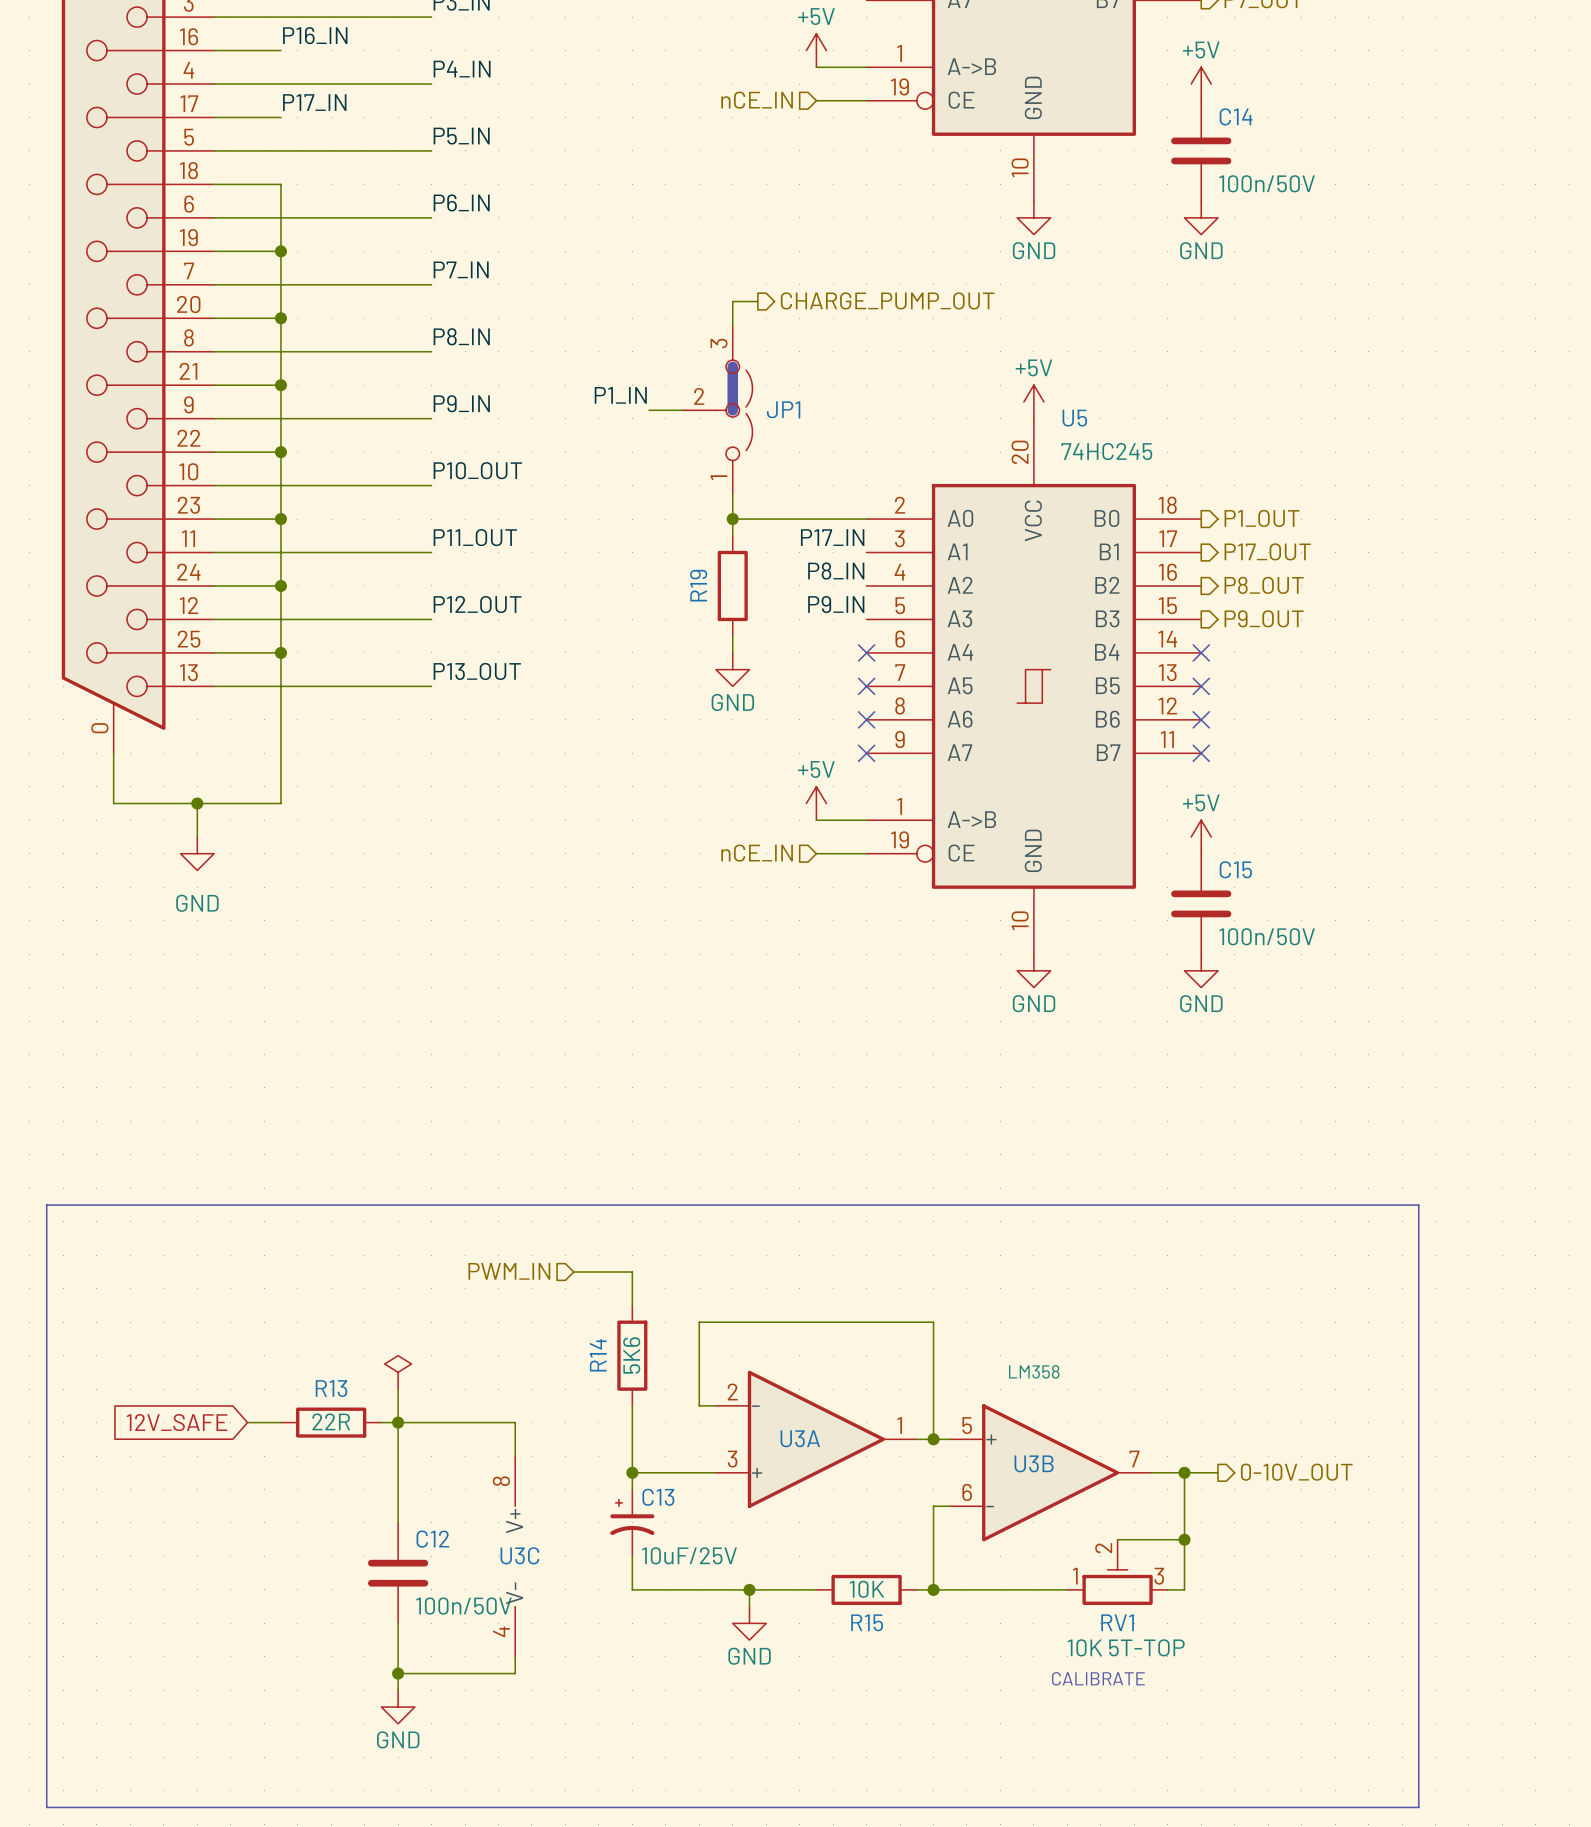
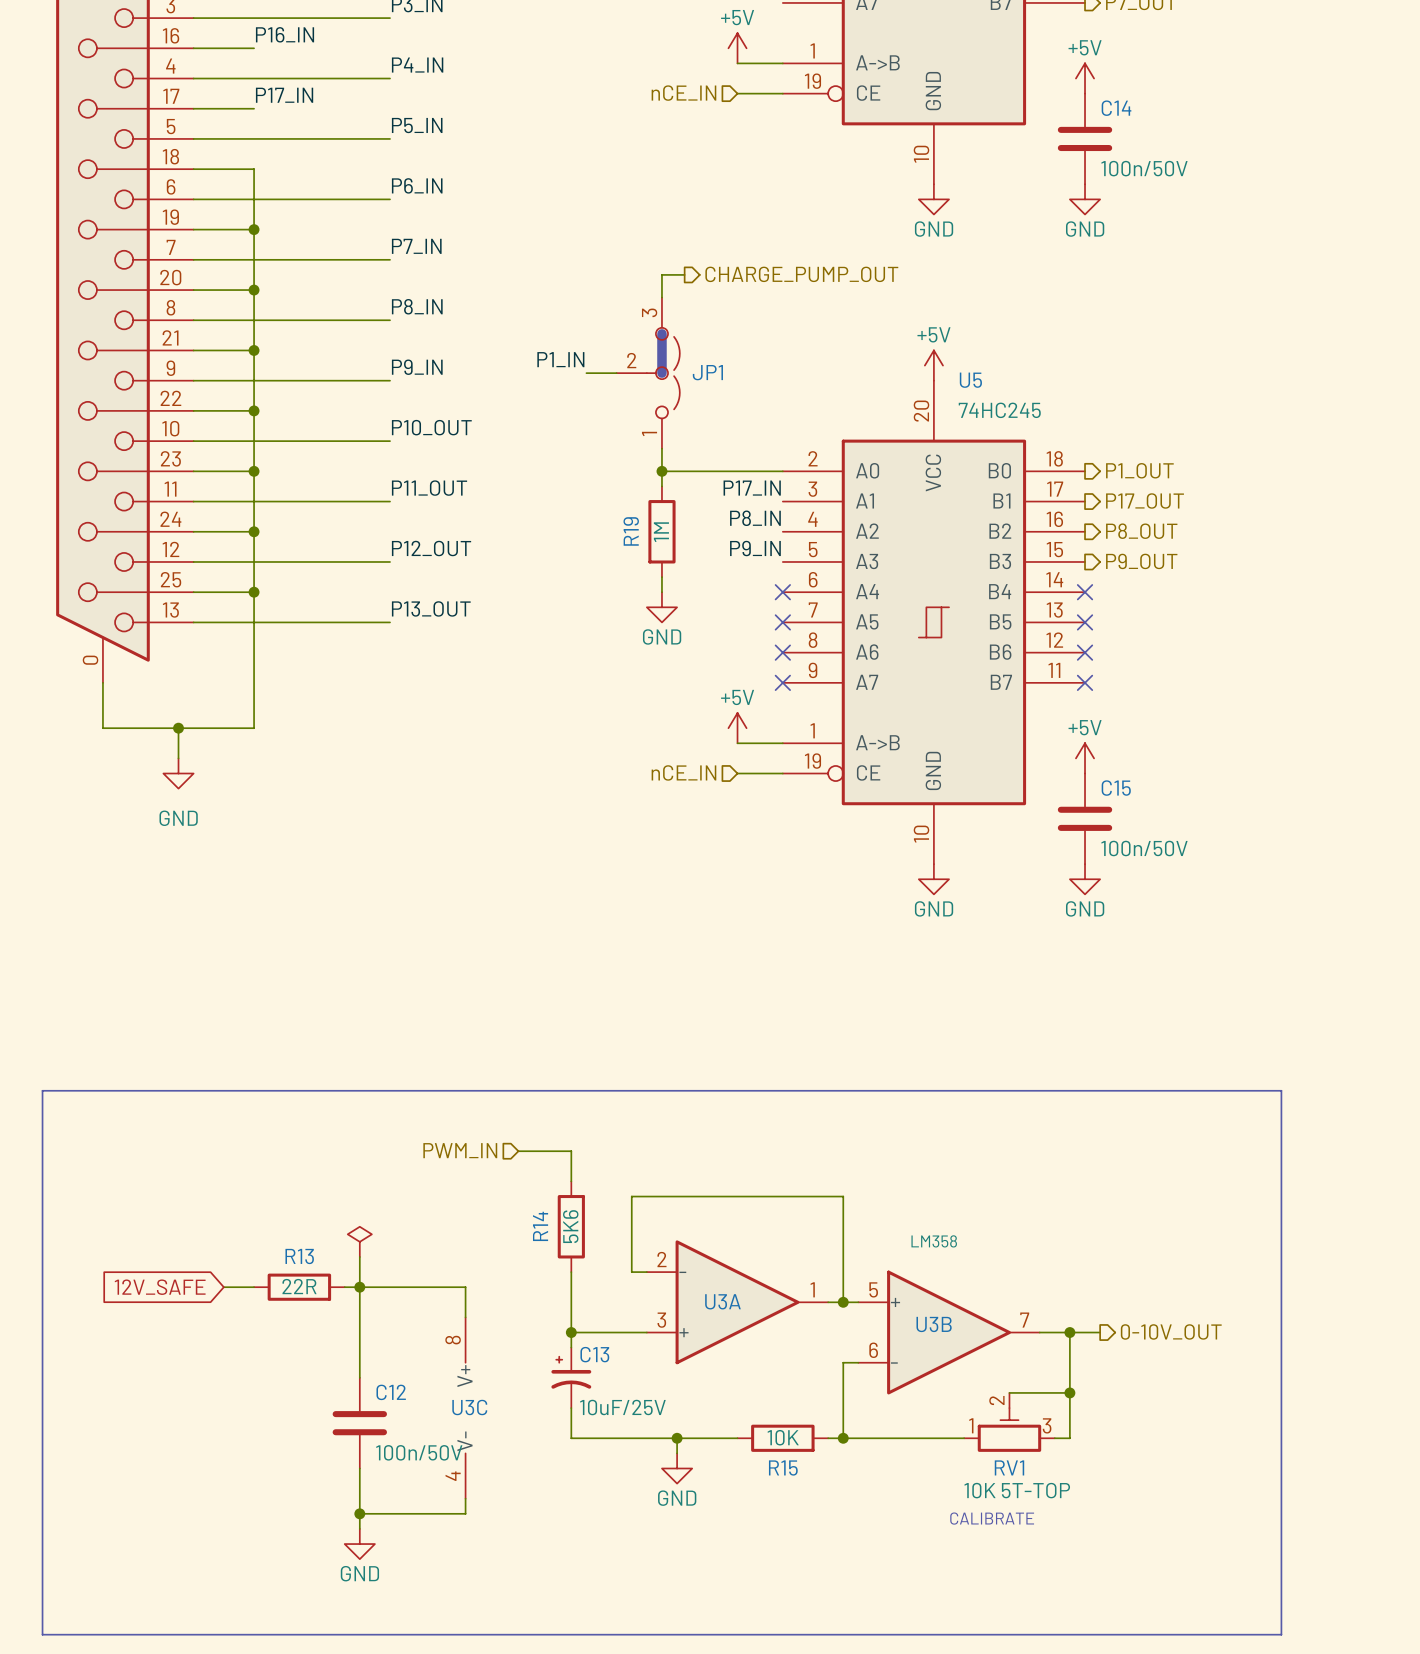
R19 value: none -> 1M (661, 532)

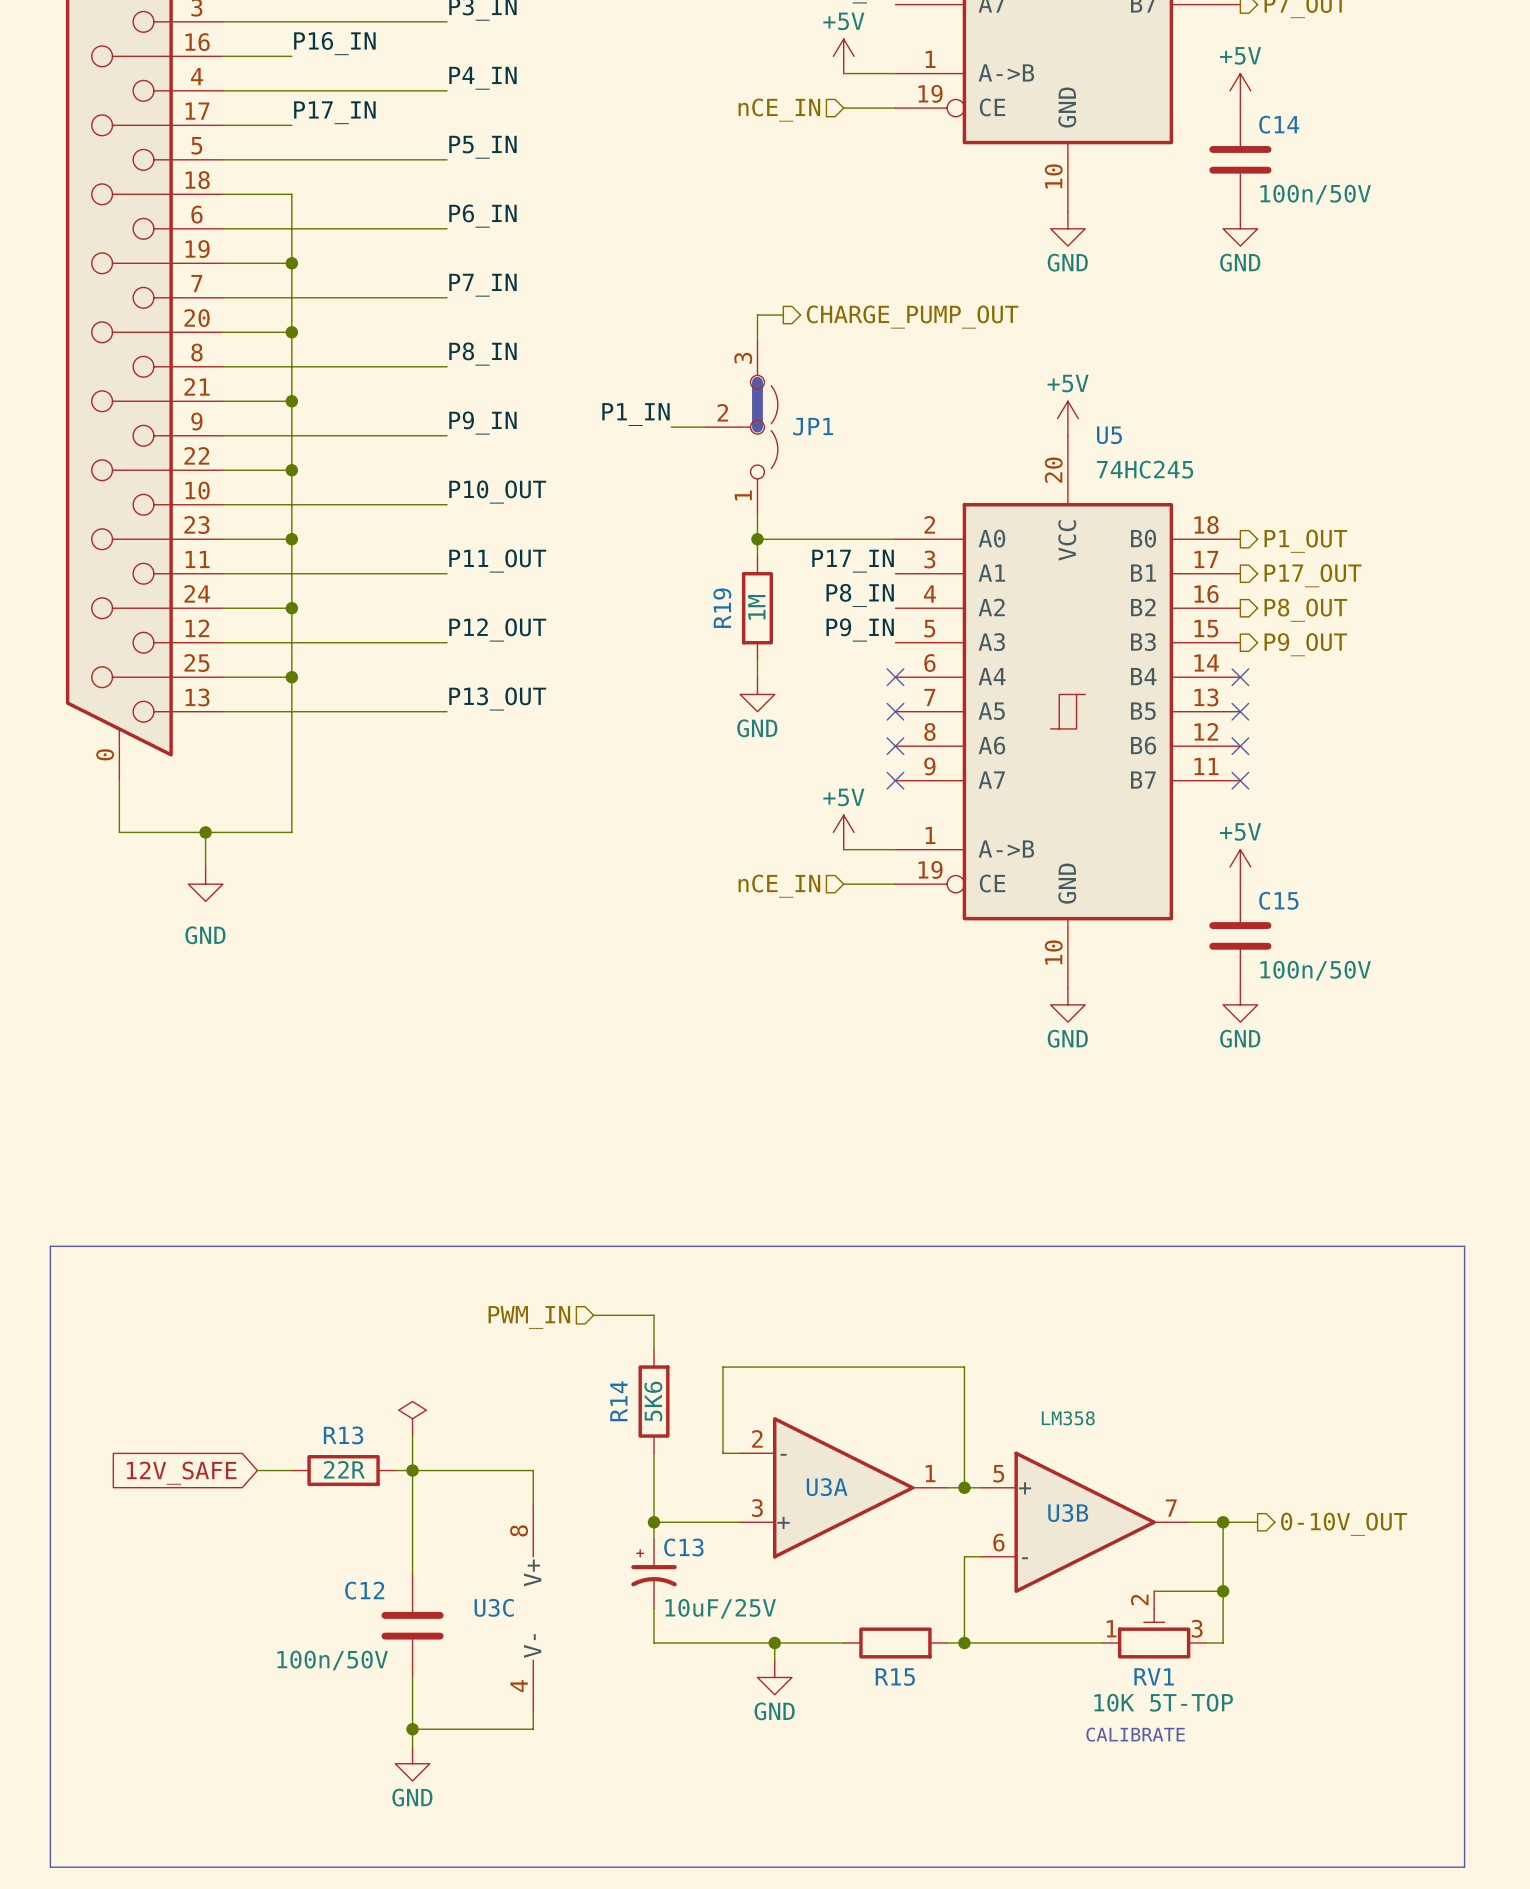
C12 name position: C12 (391, 1392) -> C12 (364, 1590)
U3C name position: U3C (469, 1407) -> U3C (494, 1607)
R15 value: 10K (783, 1437) -> none
C12 value position: 100n/50V (419, 1452) -> 100n/50V (332, 1660)

